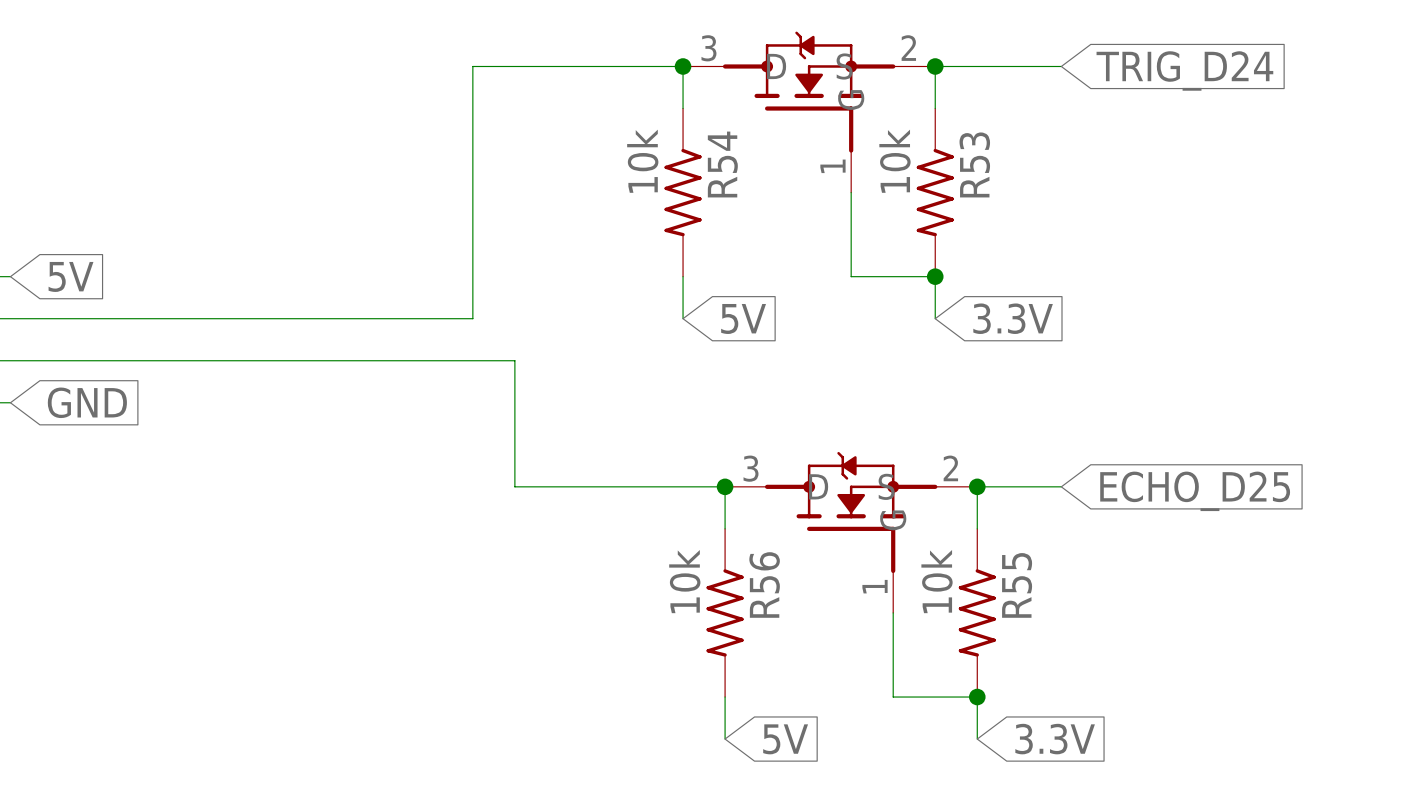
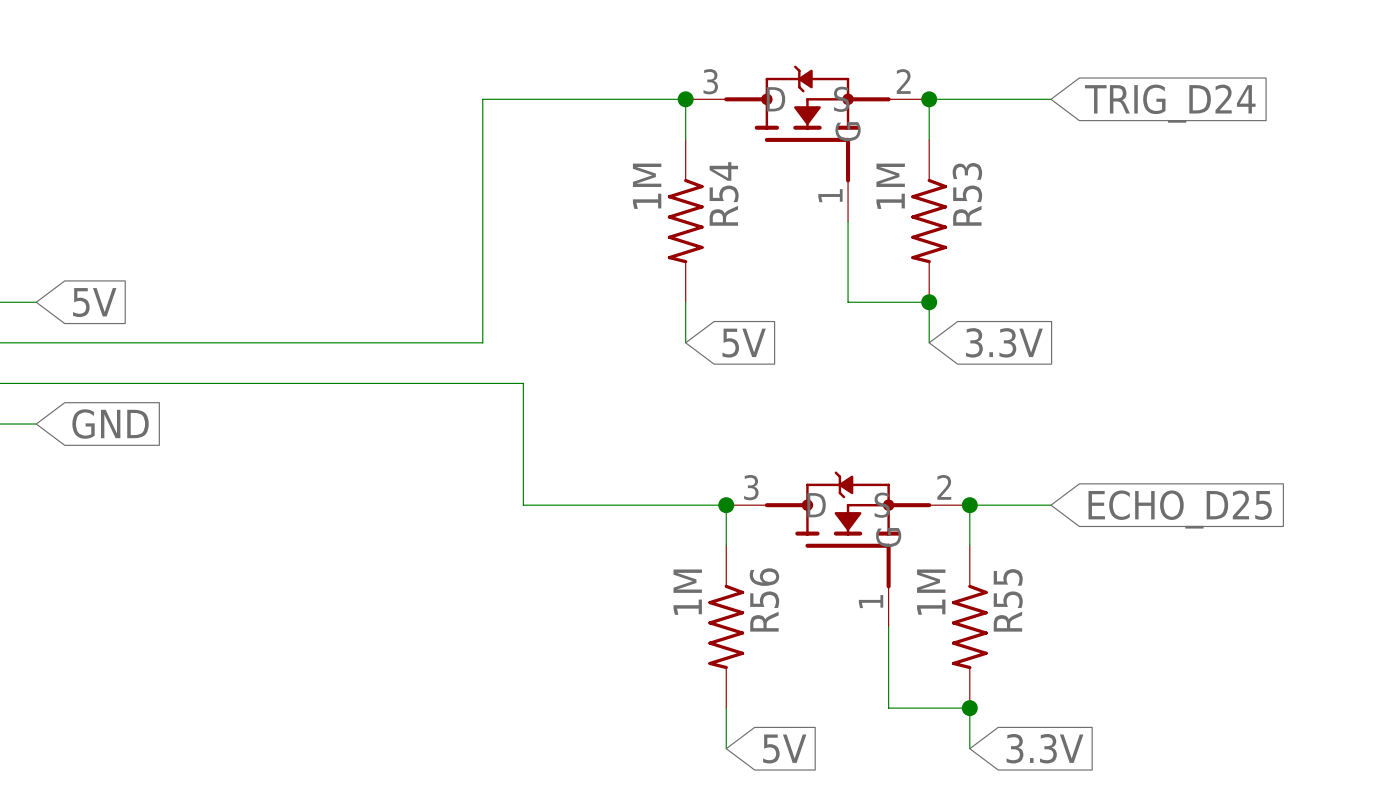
R54 value: 10k (642, 161) -> 1M (647, 186)
R53 value: 10k (894, 161) -> 1M (890, 186)
R56 value: 10k (684, 581) -> 1M (687, 592)
R55 value: 10k (937, 581) -> 1M (931, 592)

